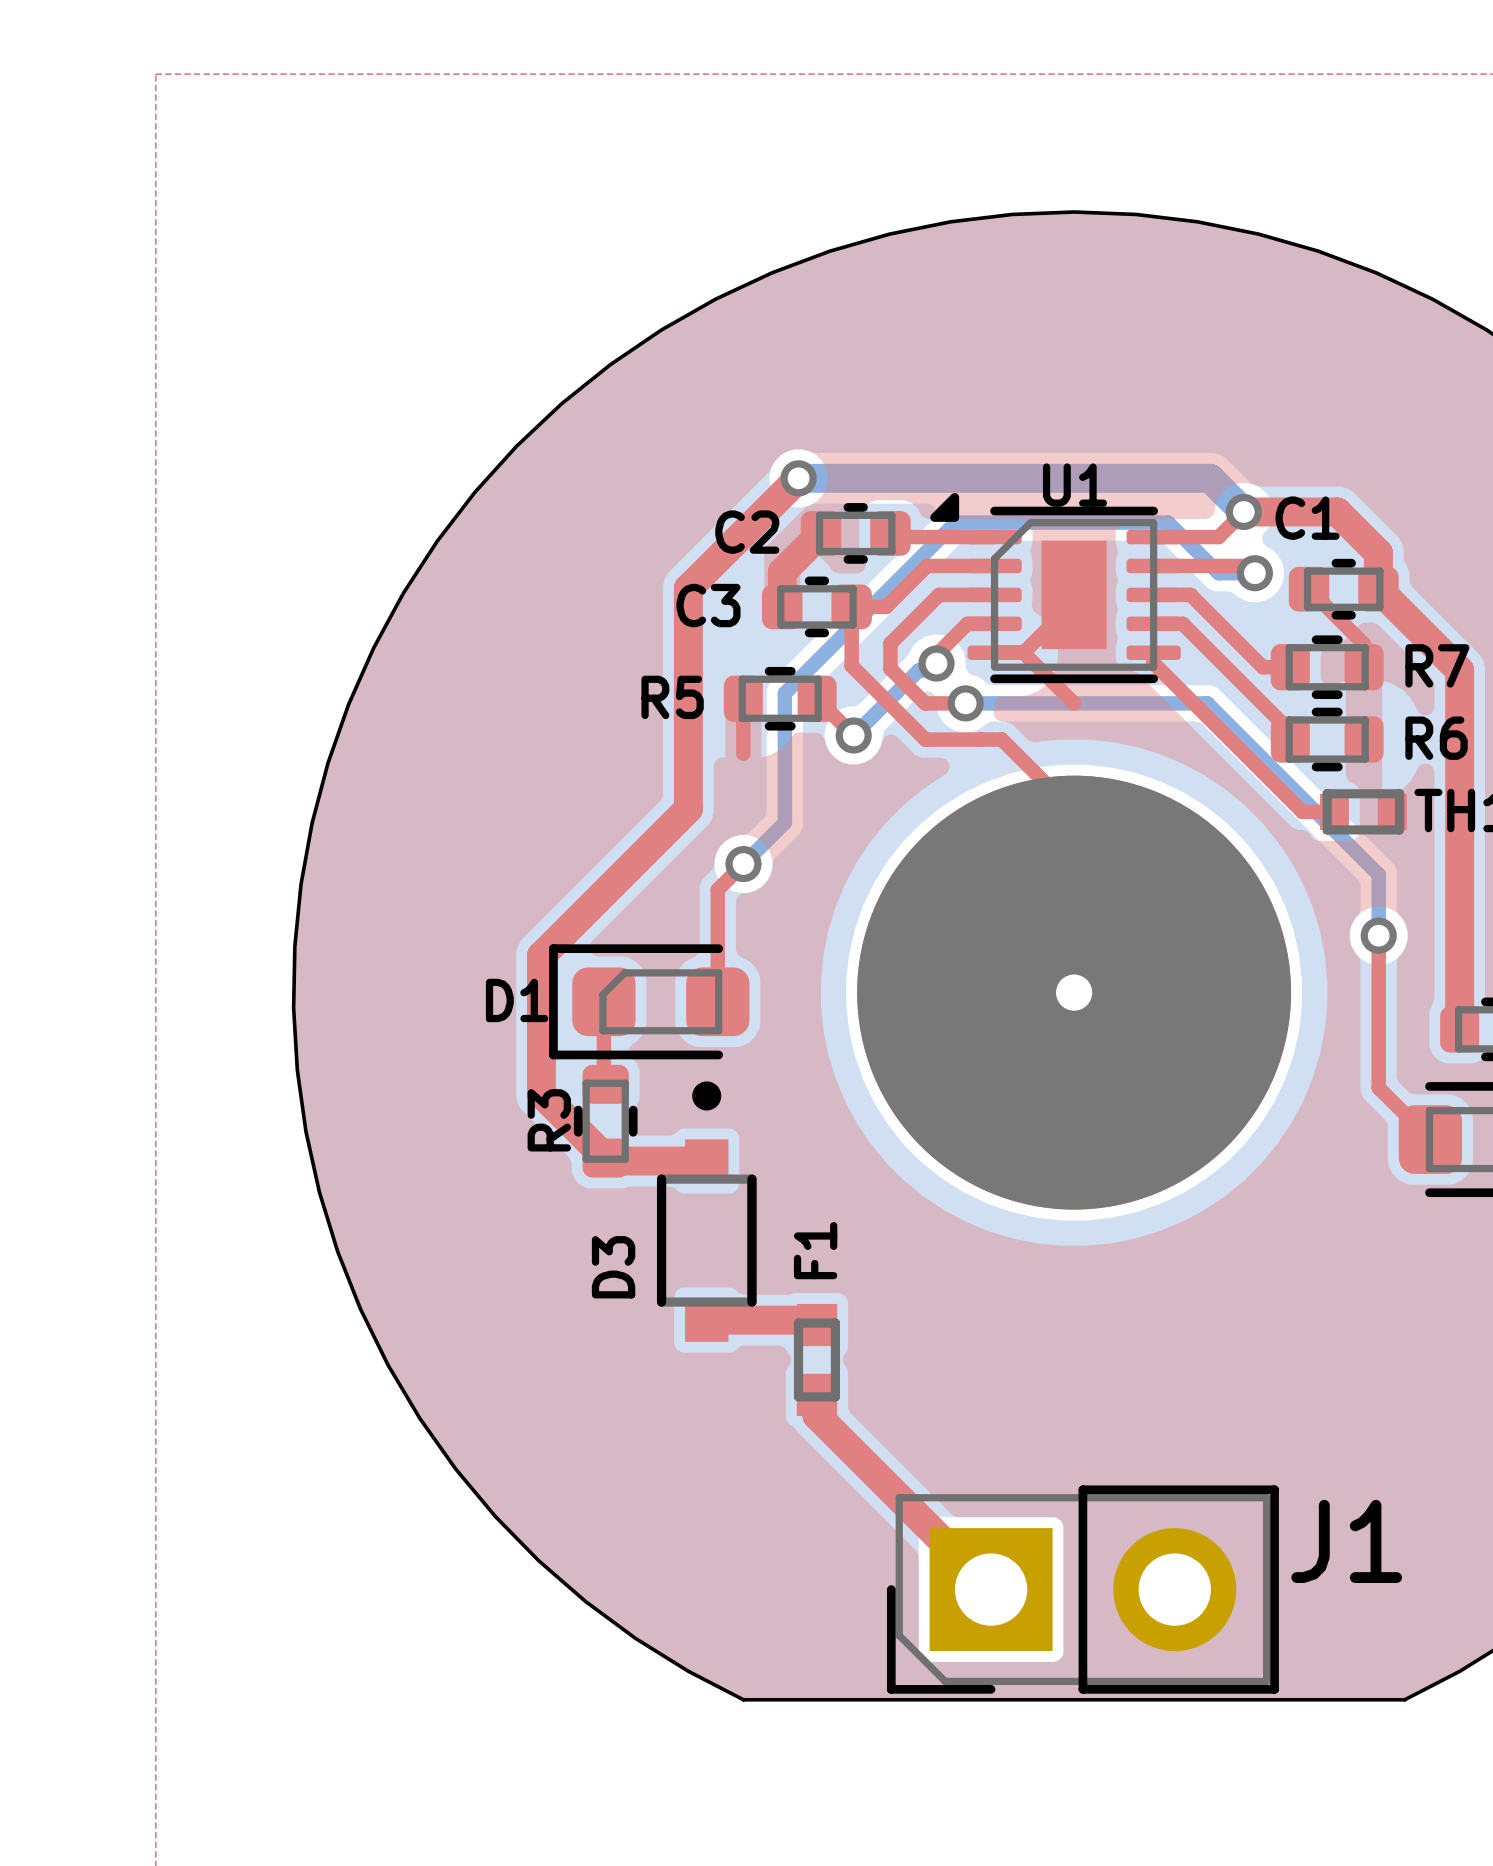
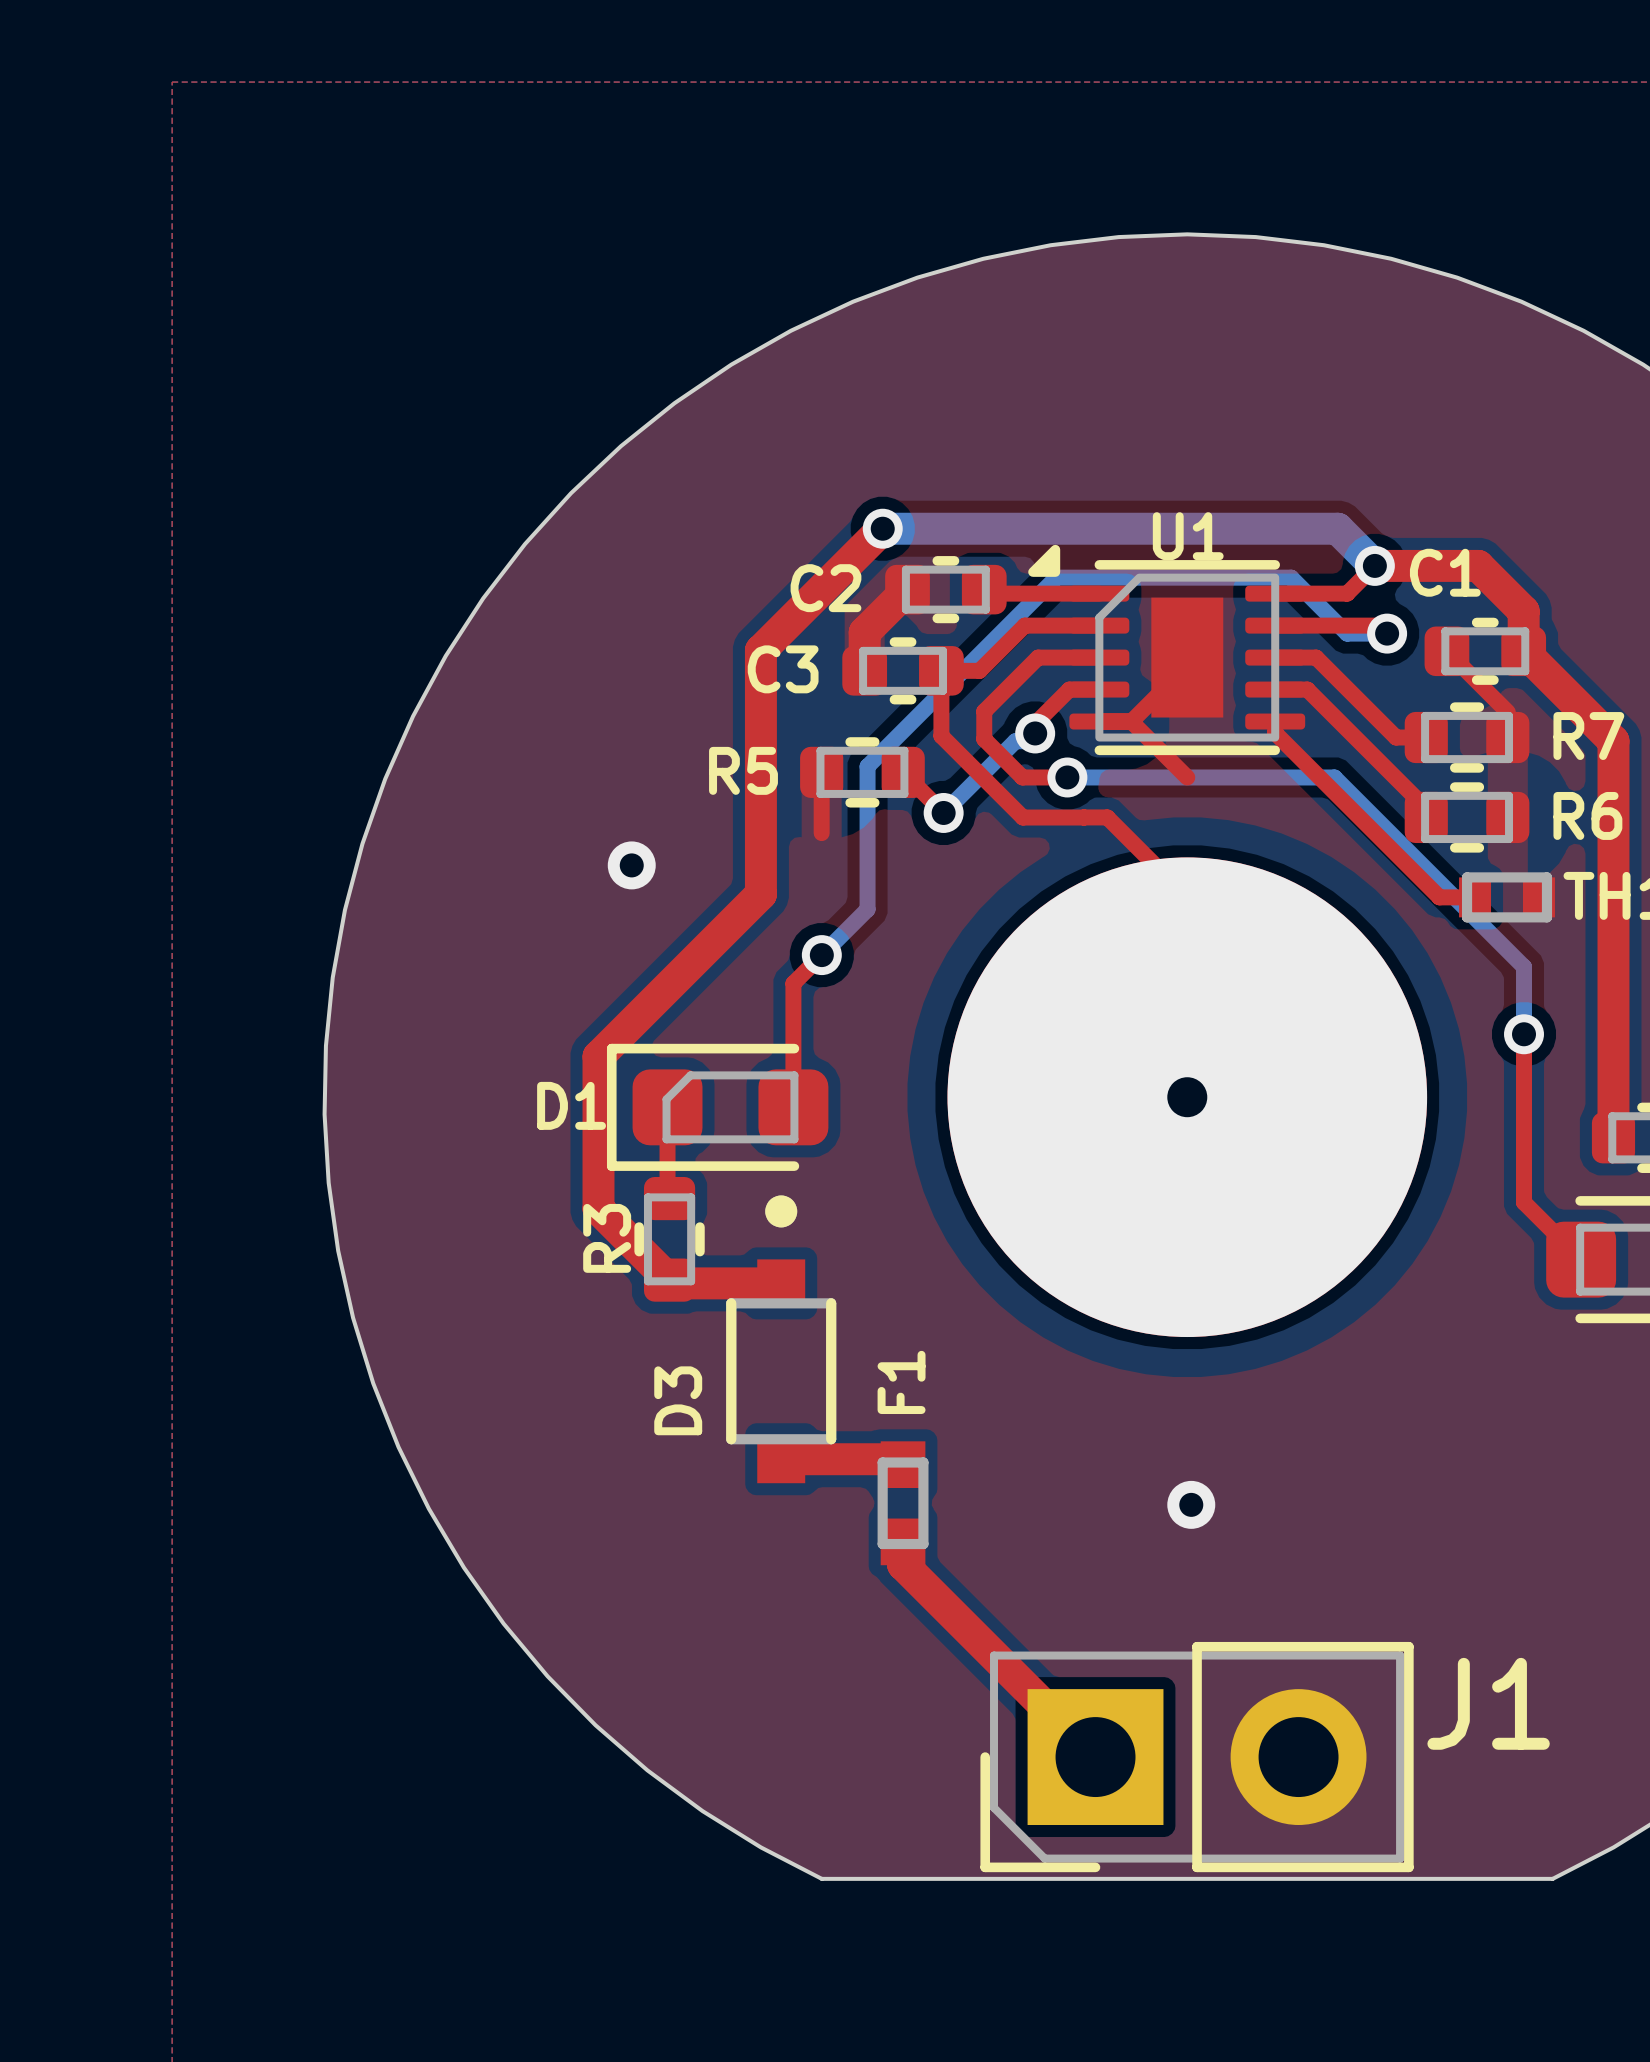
via: none -> (631, 865)
via: none -> (1191, 1504)

